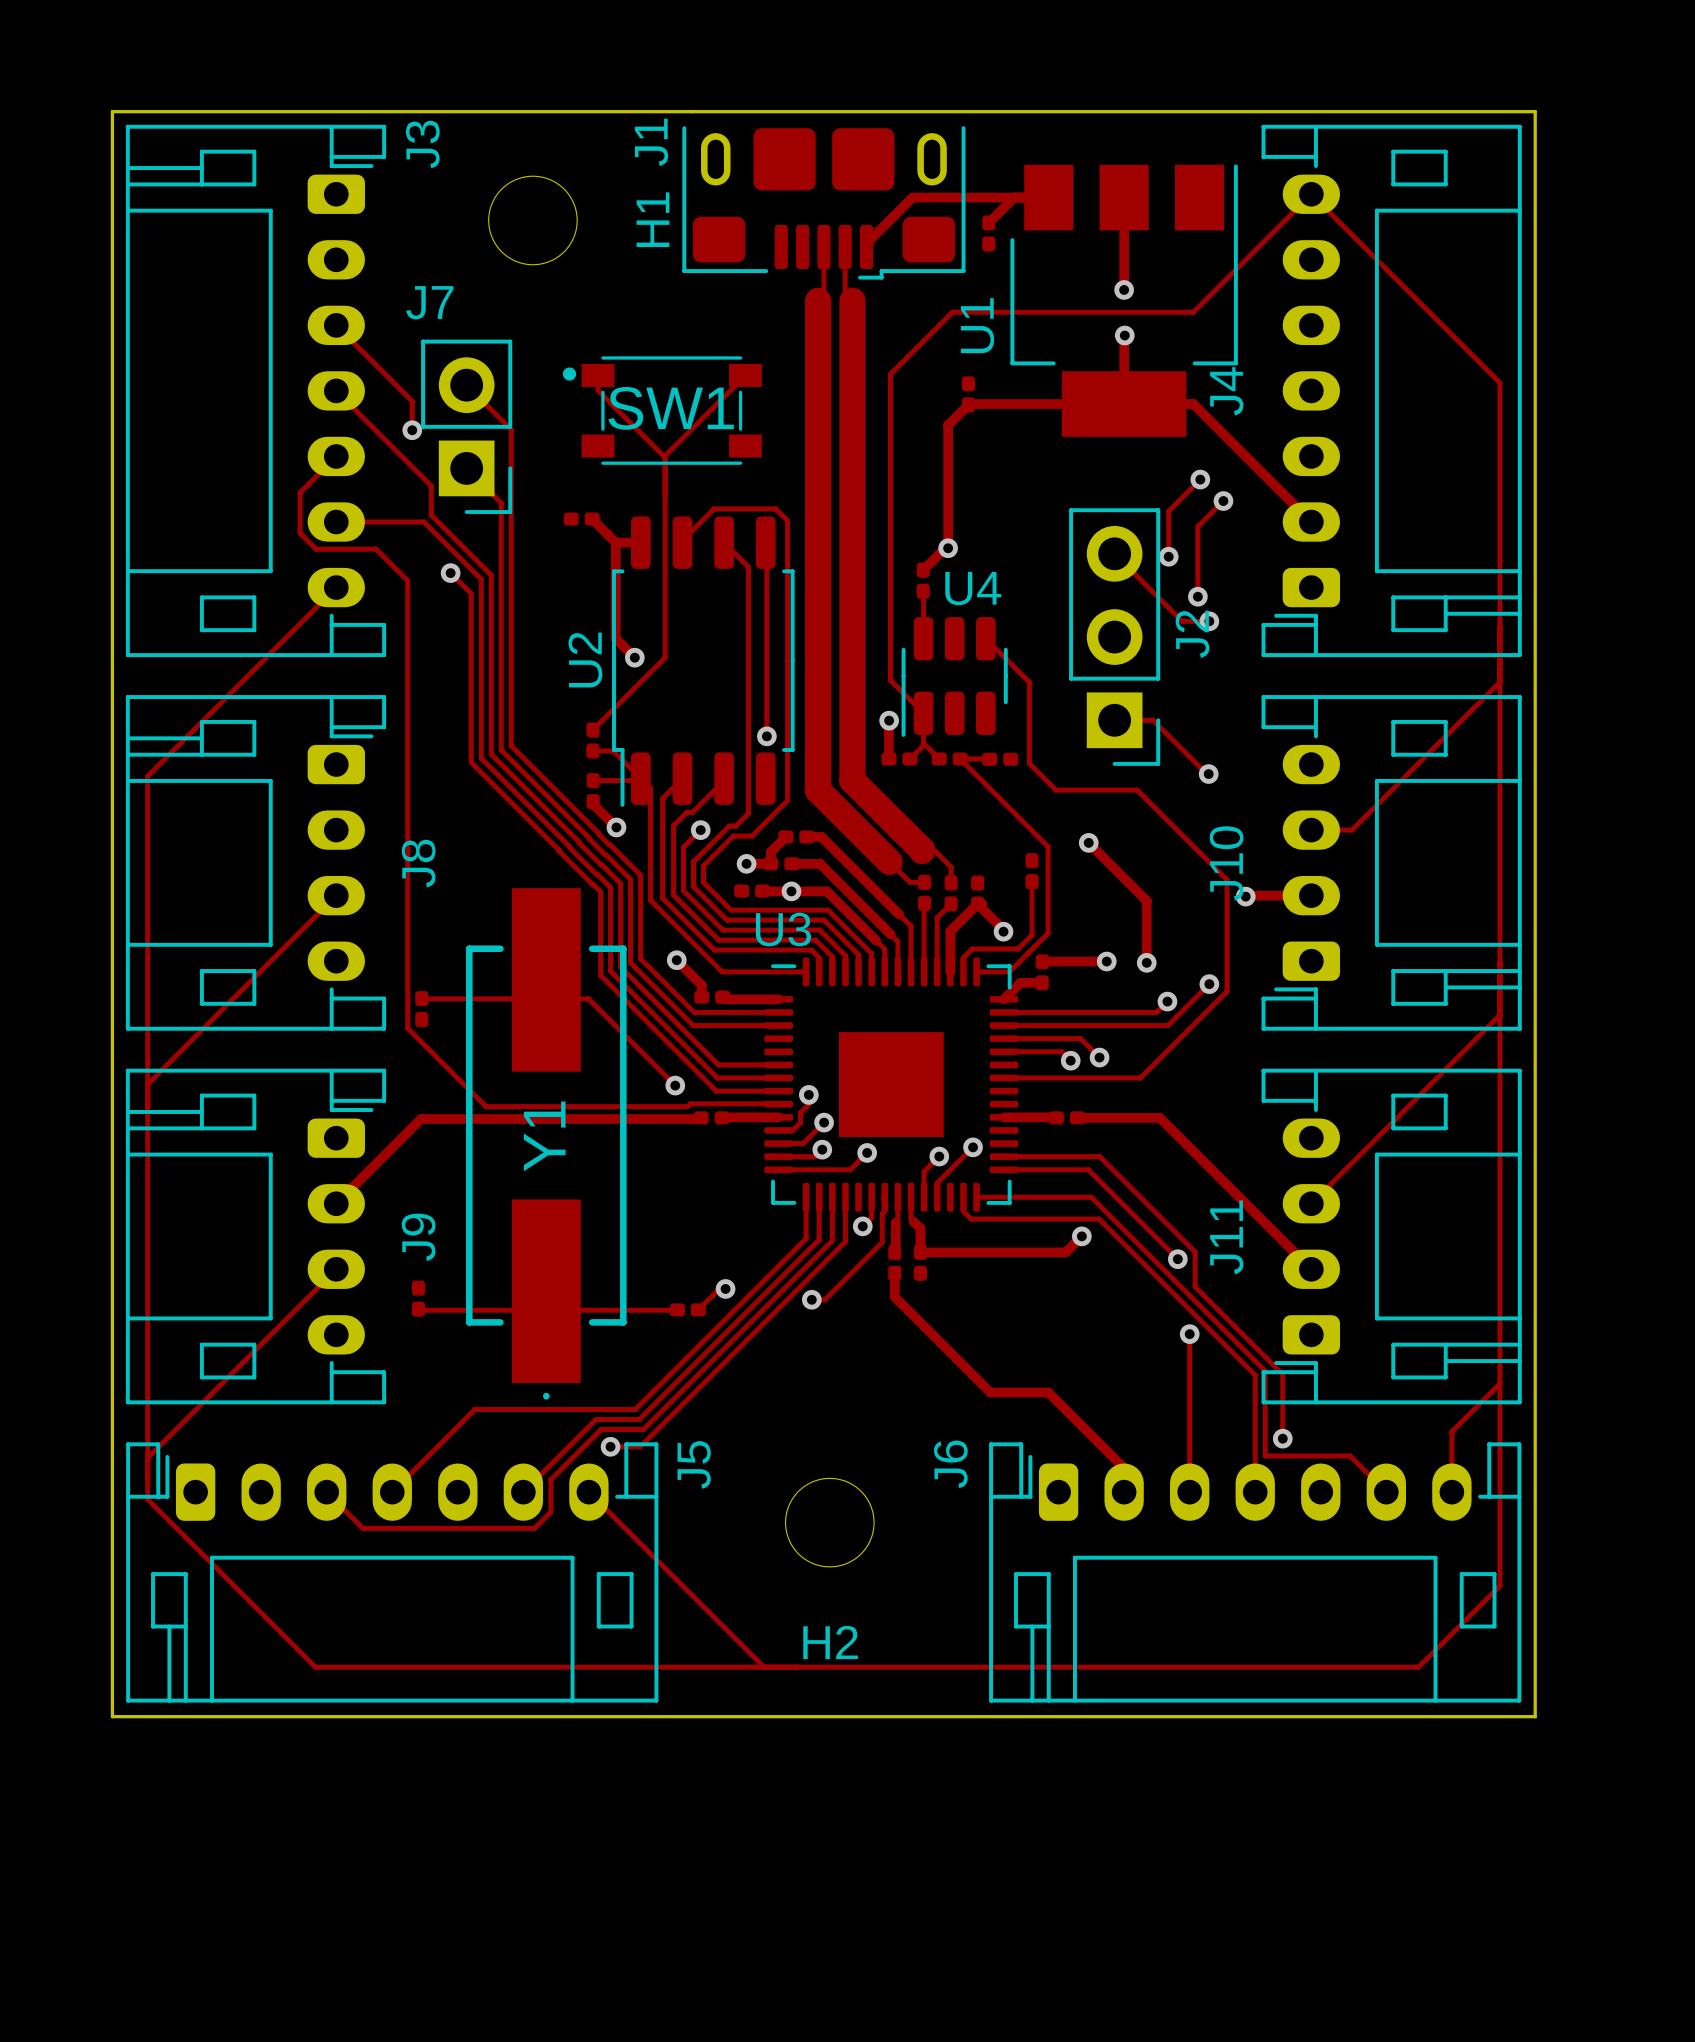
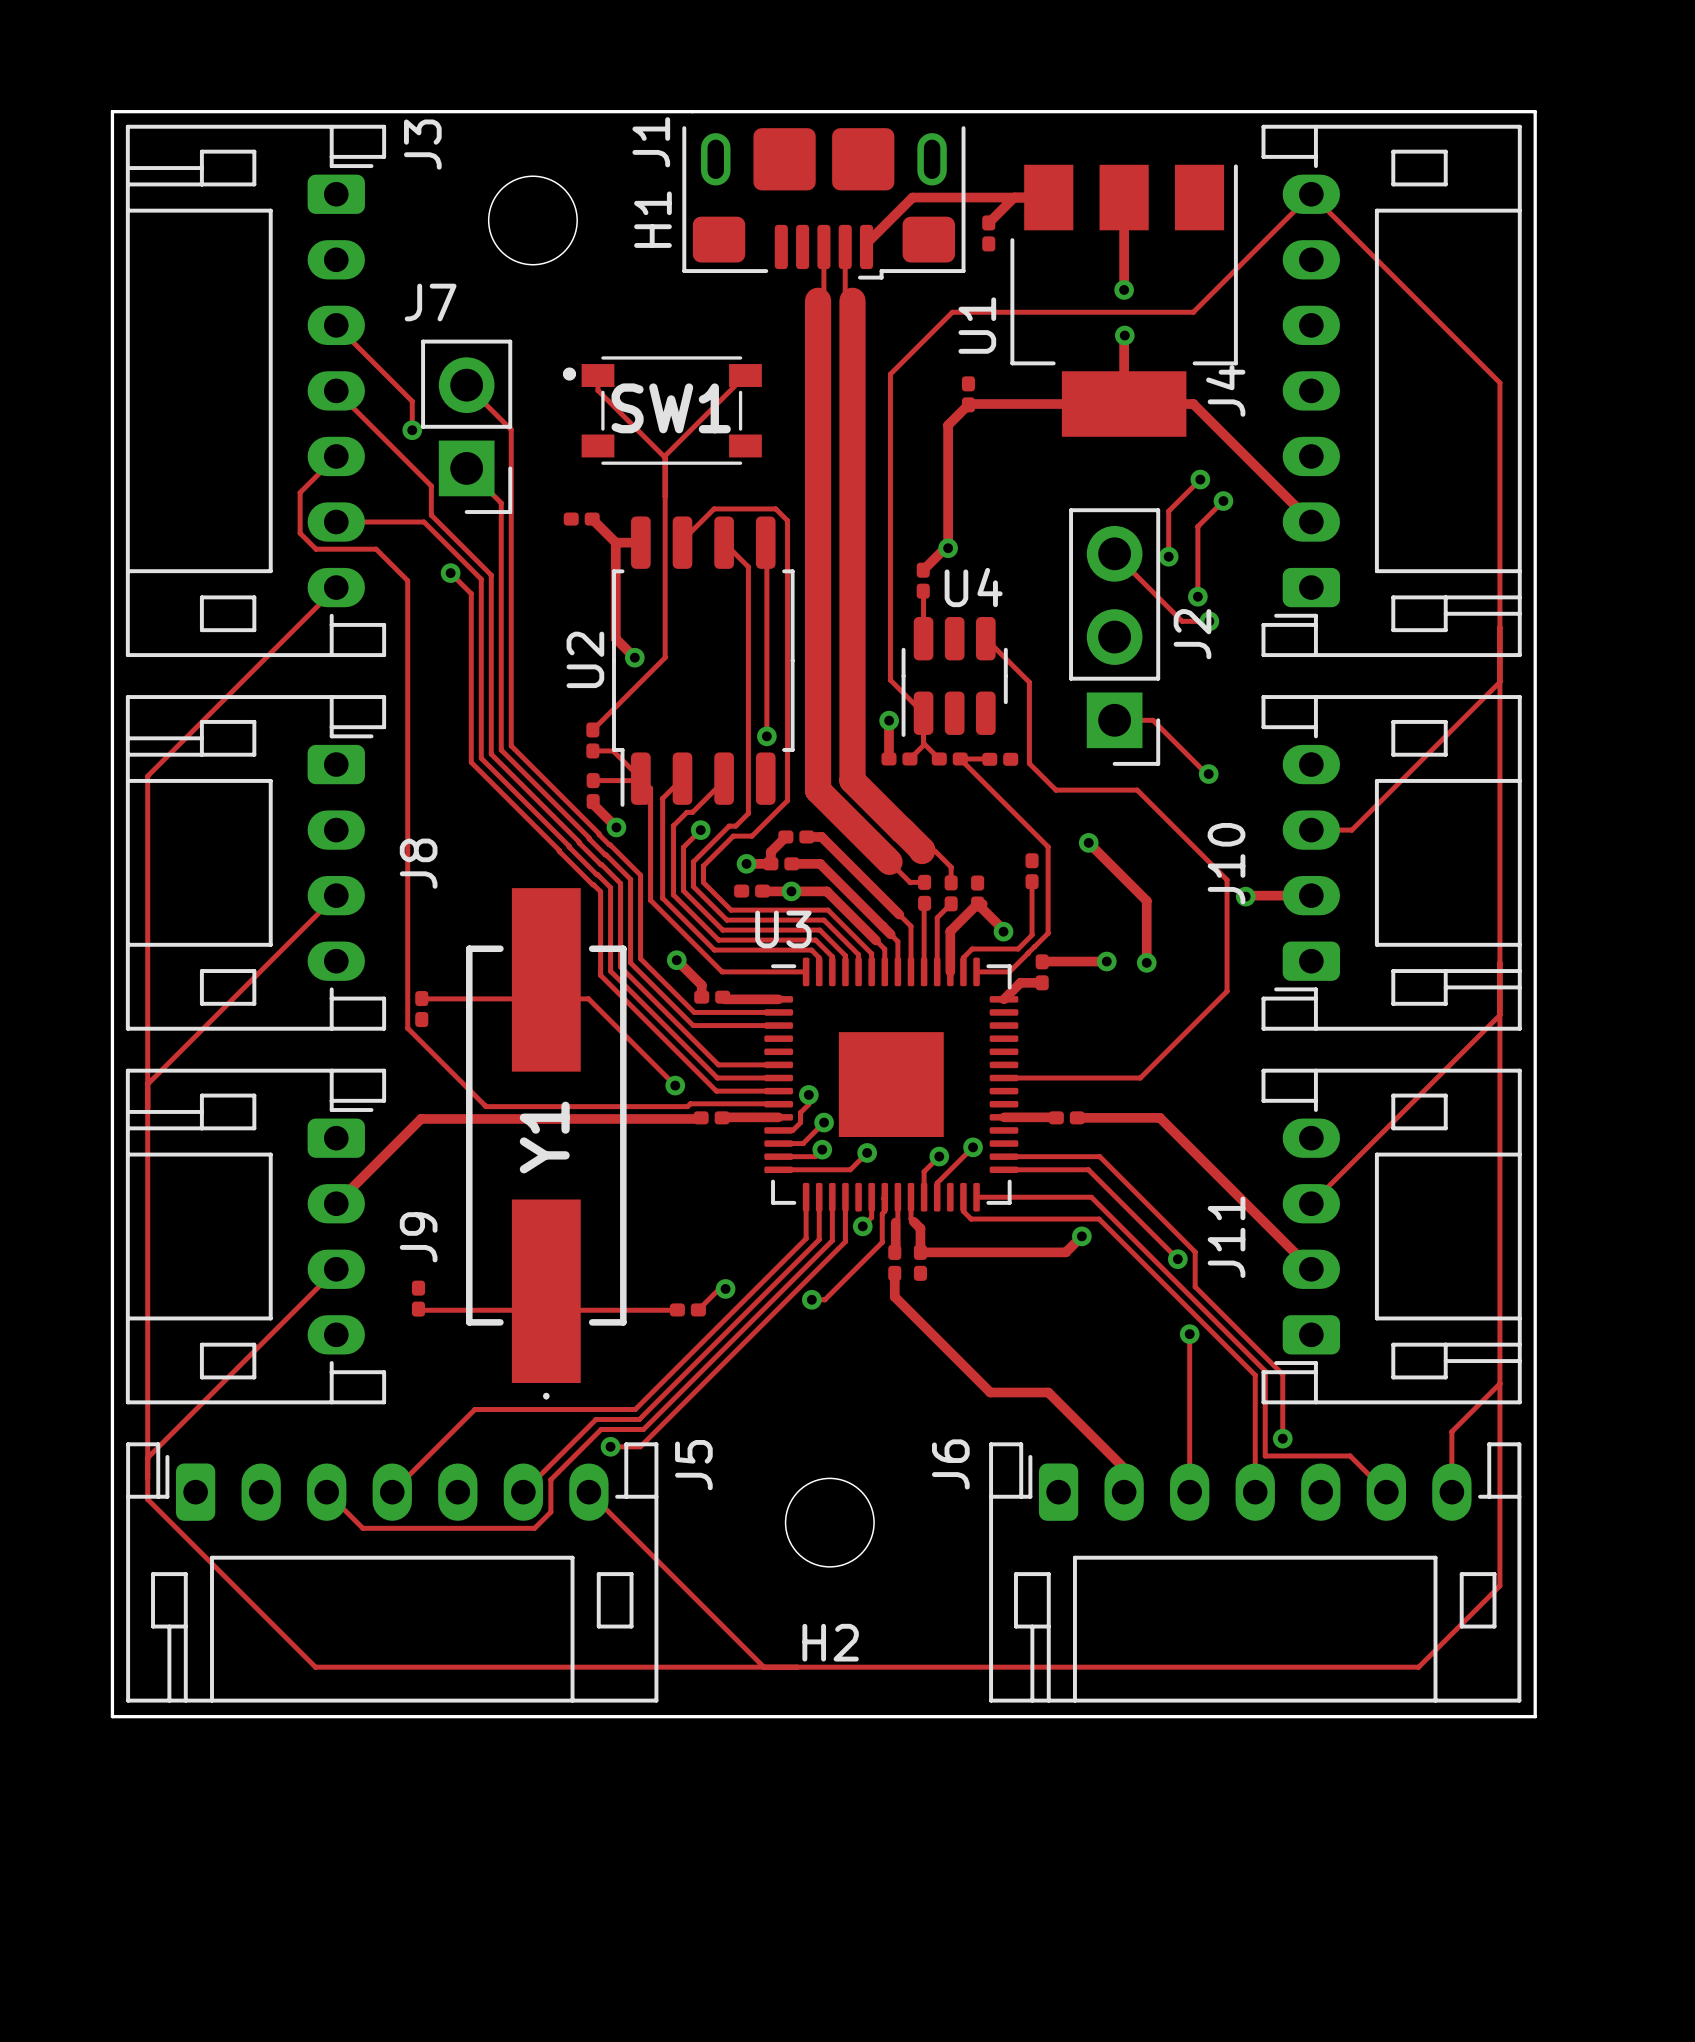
track: (1209, 984) (1167, 1025) (1004, 1025) -> none
via: (1209, 984) -> none
track: (1167, 1001) (1156, 1012) (1004, 1012) -> none
via: (1167, 1001) -> none
track: (1004, 1038) (1080, 1038) (1099, 1057) -> none
track: (1004, 1051) (1061, 1051) (1070, 1060) -> none
via: (1099, 1057) -> none
via: (1070, 1060) -> none

